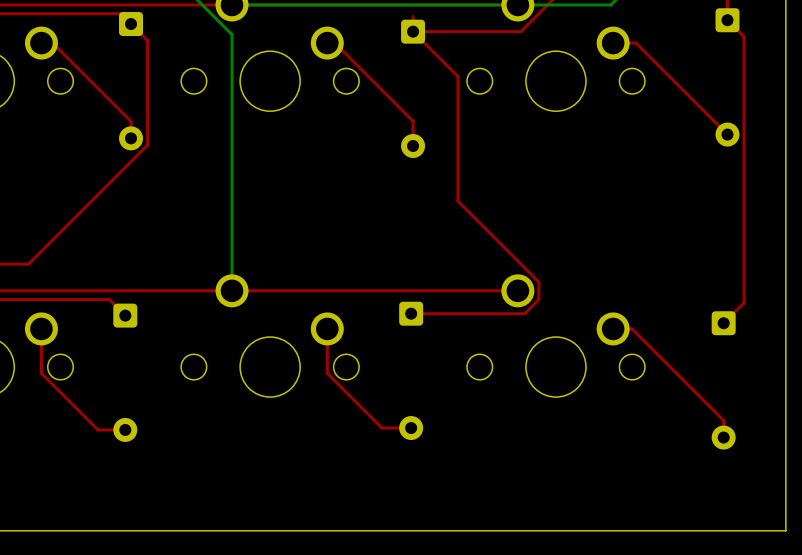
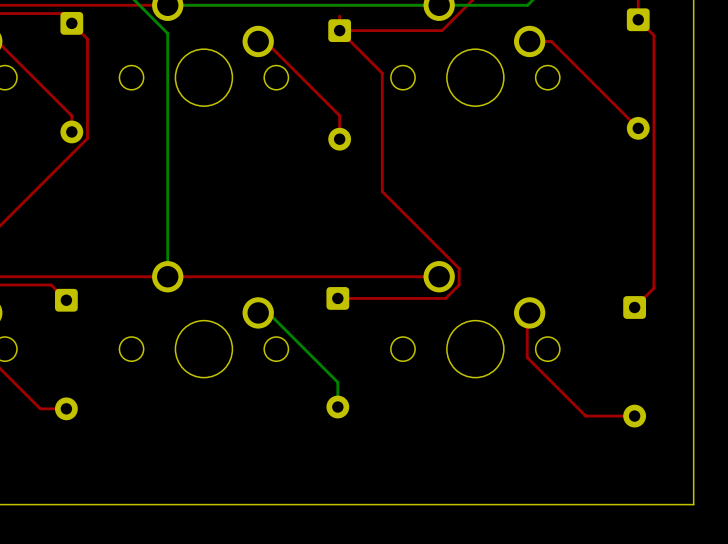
top track: (327, 328) (327, 373) (381, 428) (411, 428) -> none
bottom track: none -> (258, 312) (268, 312) (337, 382) (337, 407)
top track: (613, 328) (632, 328) (723, 420) (723, 437) -> (529, 312) (527, 315) (527, 357) (585, 416) (634, 416)

